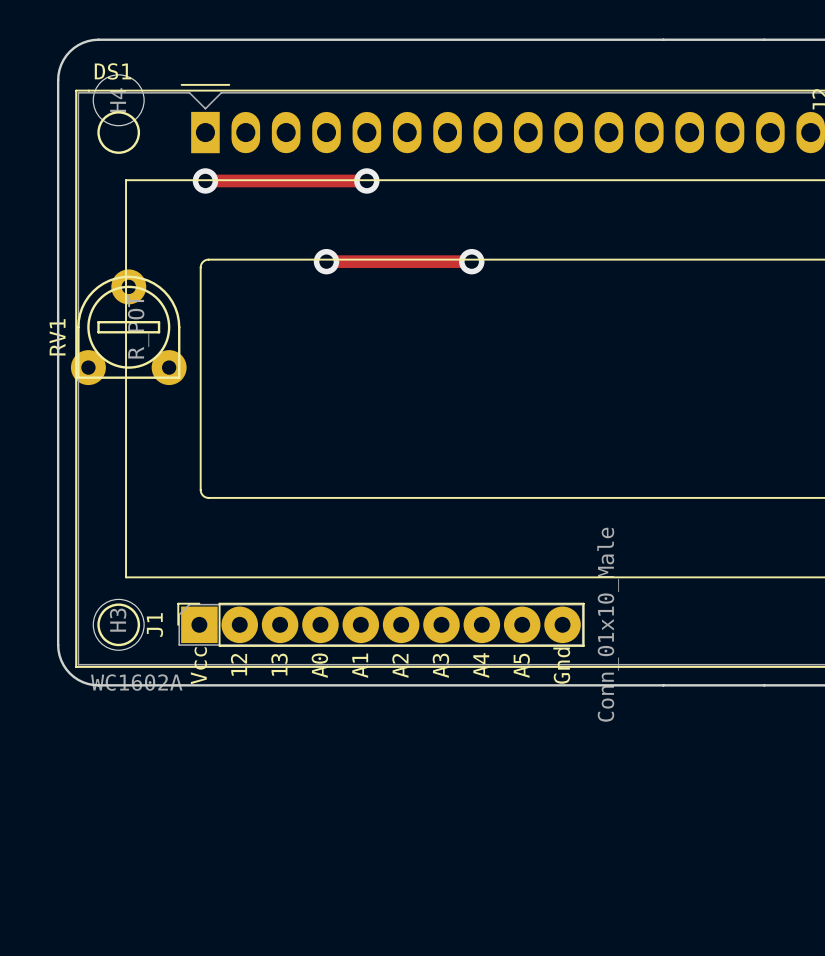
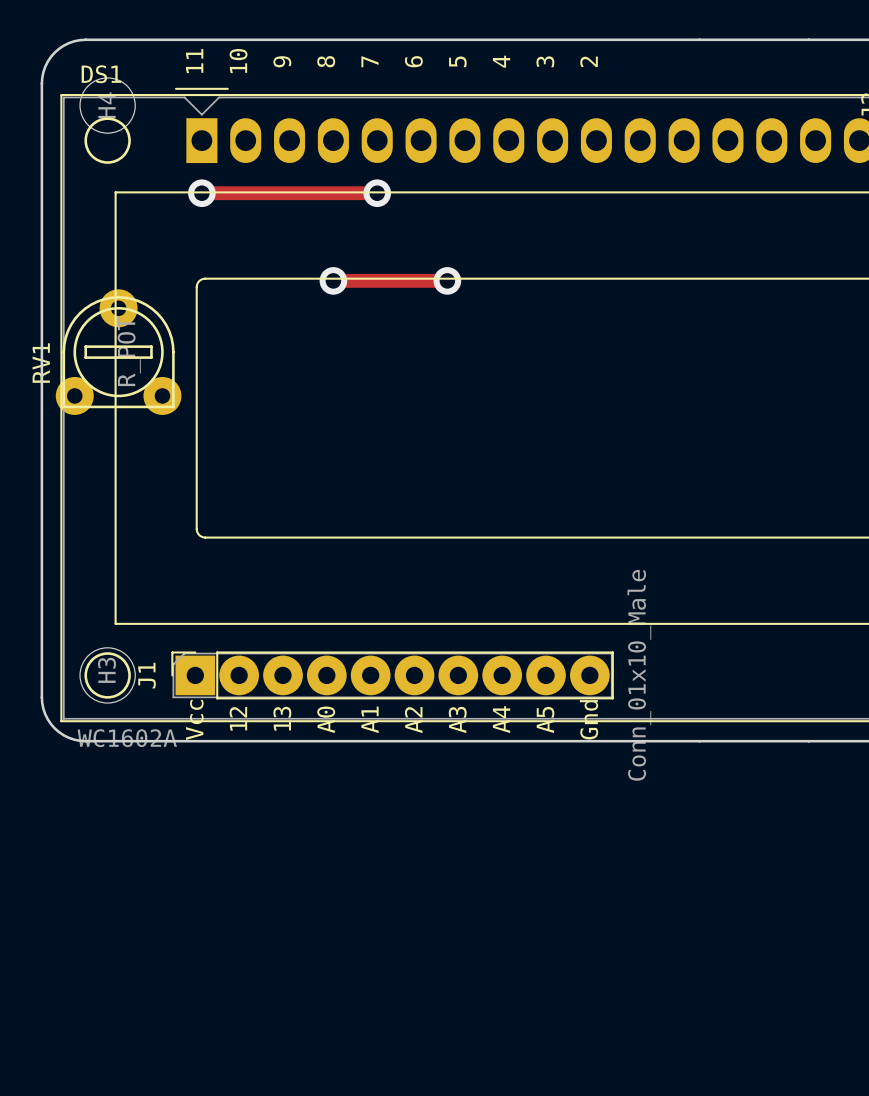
text: none -> 11 (194, 61)
text: none -> 10 (238, 61)
text: none -> 9 (282, 61)
text: none -> 8 (326, 61)
text: none -> 6 (413, 61)
text: none -> 4 (501, 61)
text: none -> 7 (370, 61)
text: none -> 5 (457, 61)
text: none -> 3 (545, 61)
text: none -> 2 (589, 61)
track: (431, 261) (471, 261) -> none
via position: (471, 261) -> (447, 280)

